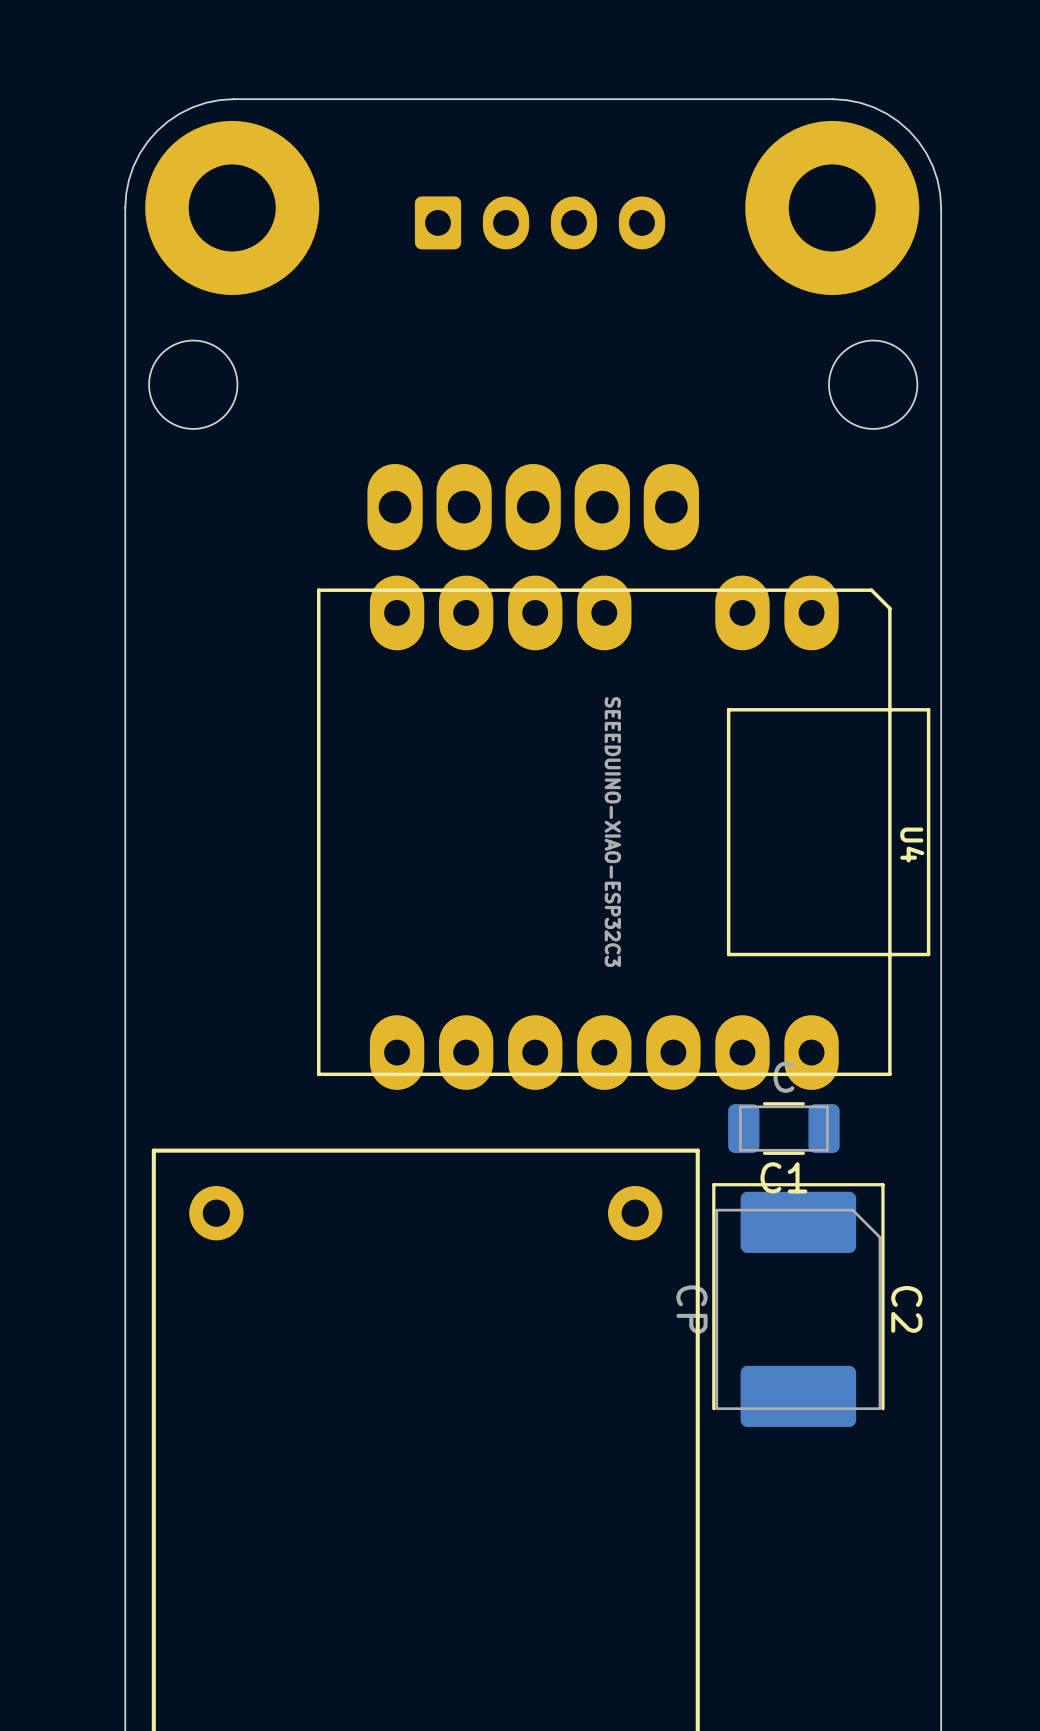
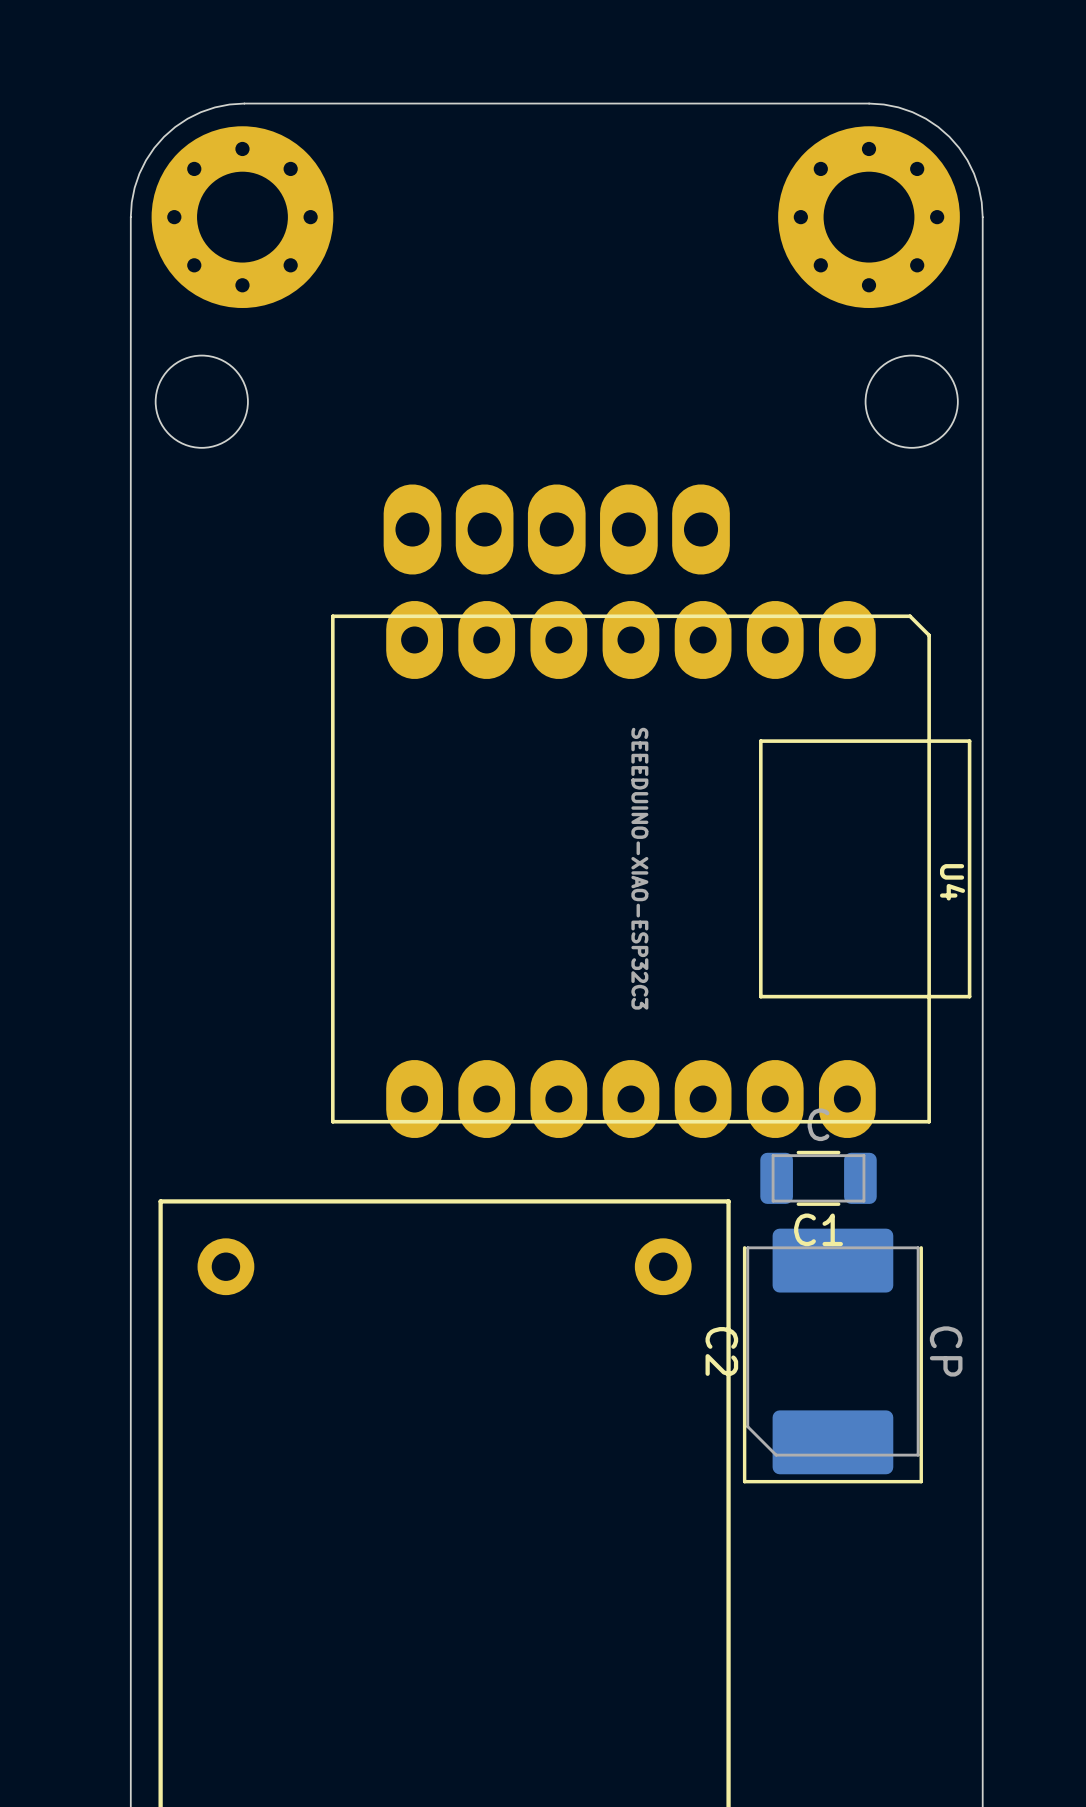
part footprint: [145, 120, 320, 295] -> [151, 126, 334, 309]
part footprint: [745, 120, 920, 295] -> [778, 126, 960, 309]
part: (540, 222) -> none
U4 footprint: [317, 575, 931, 1090] -> [331, 600, 972, 1139]
C2 rotation: 0° (798, 1305) -> 180° (832, 1356)

